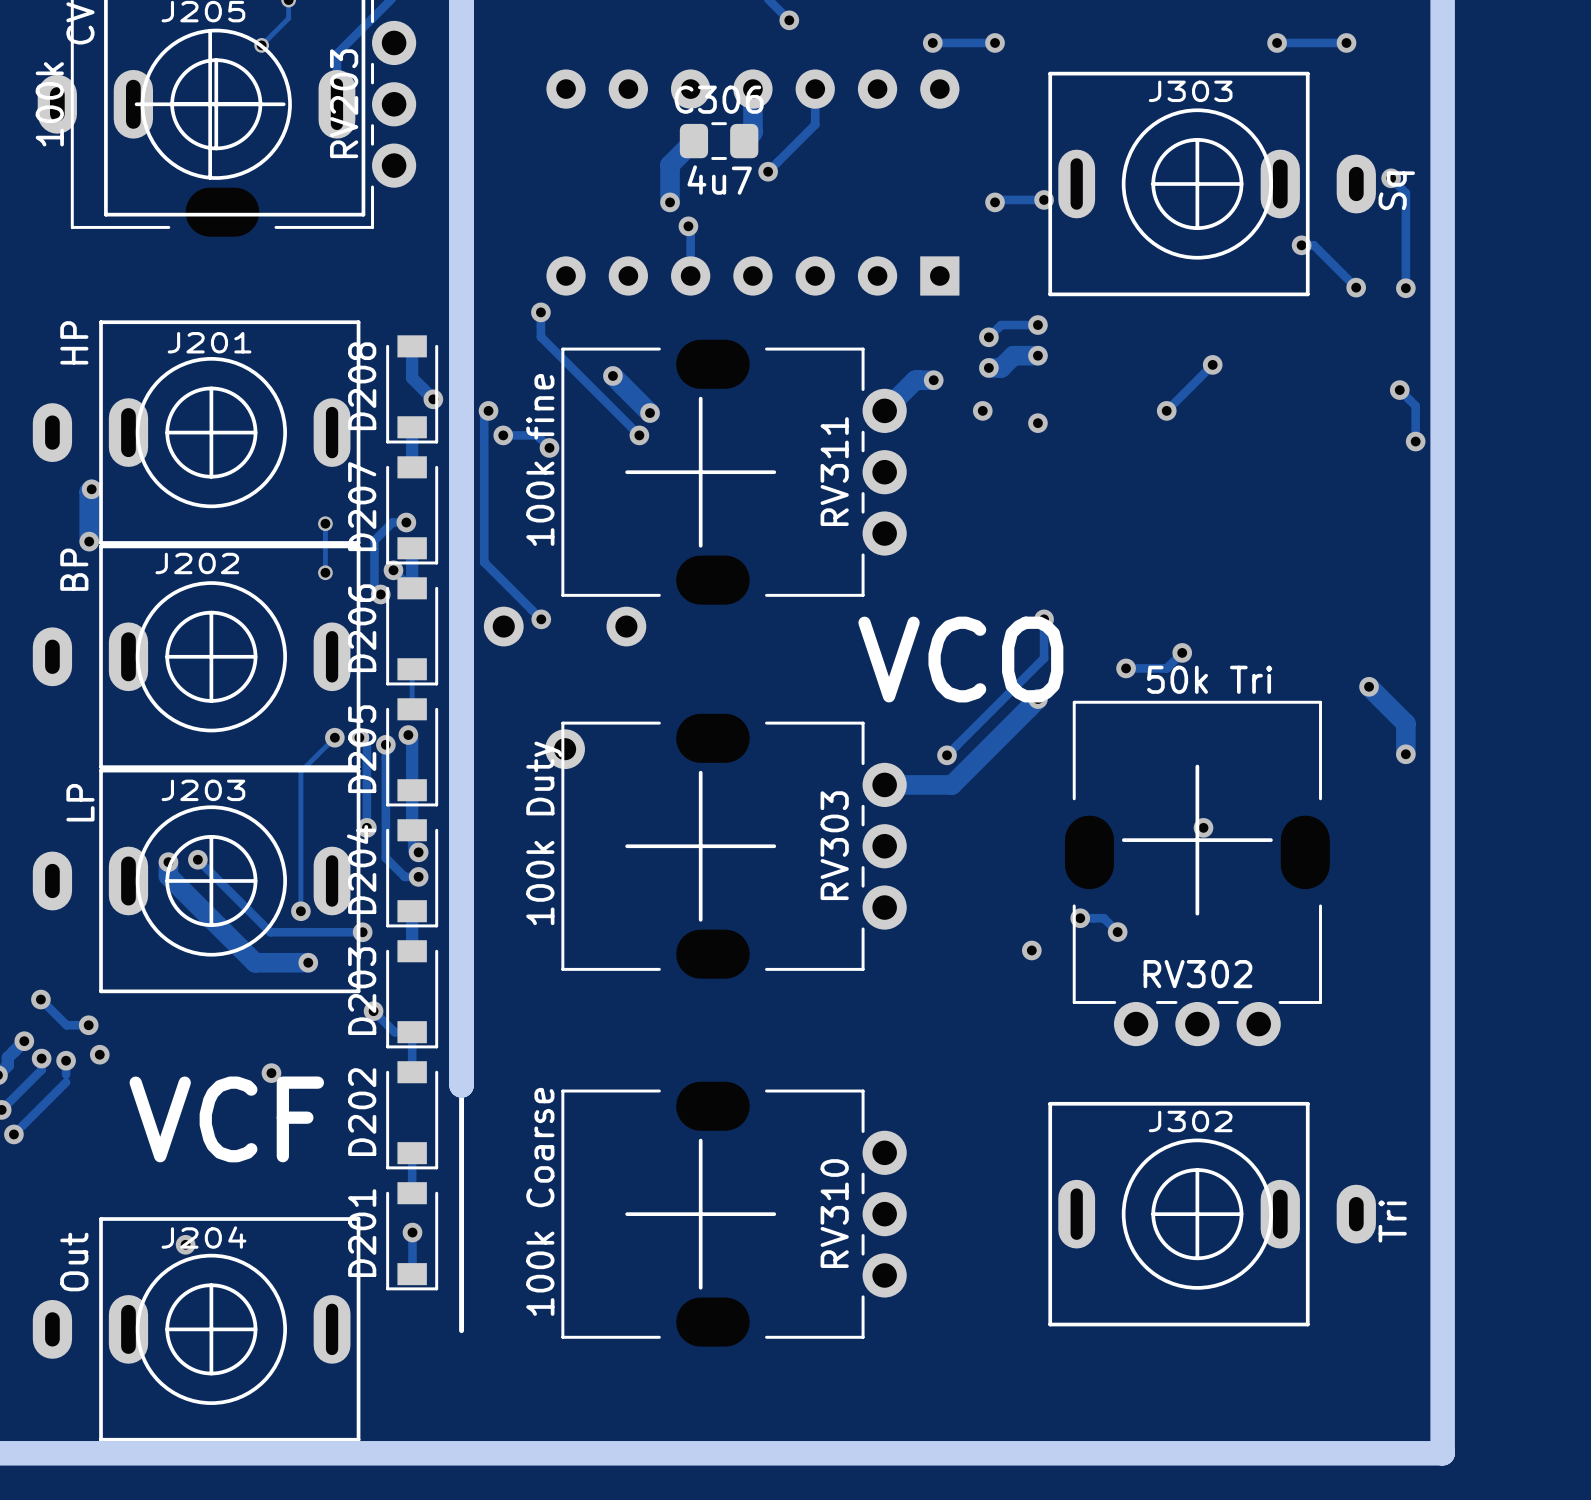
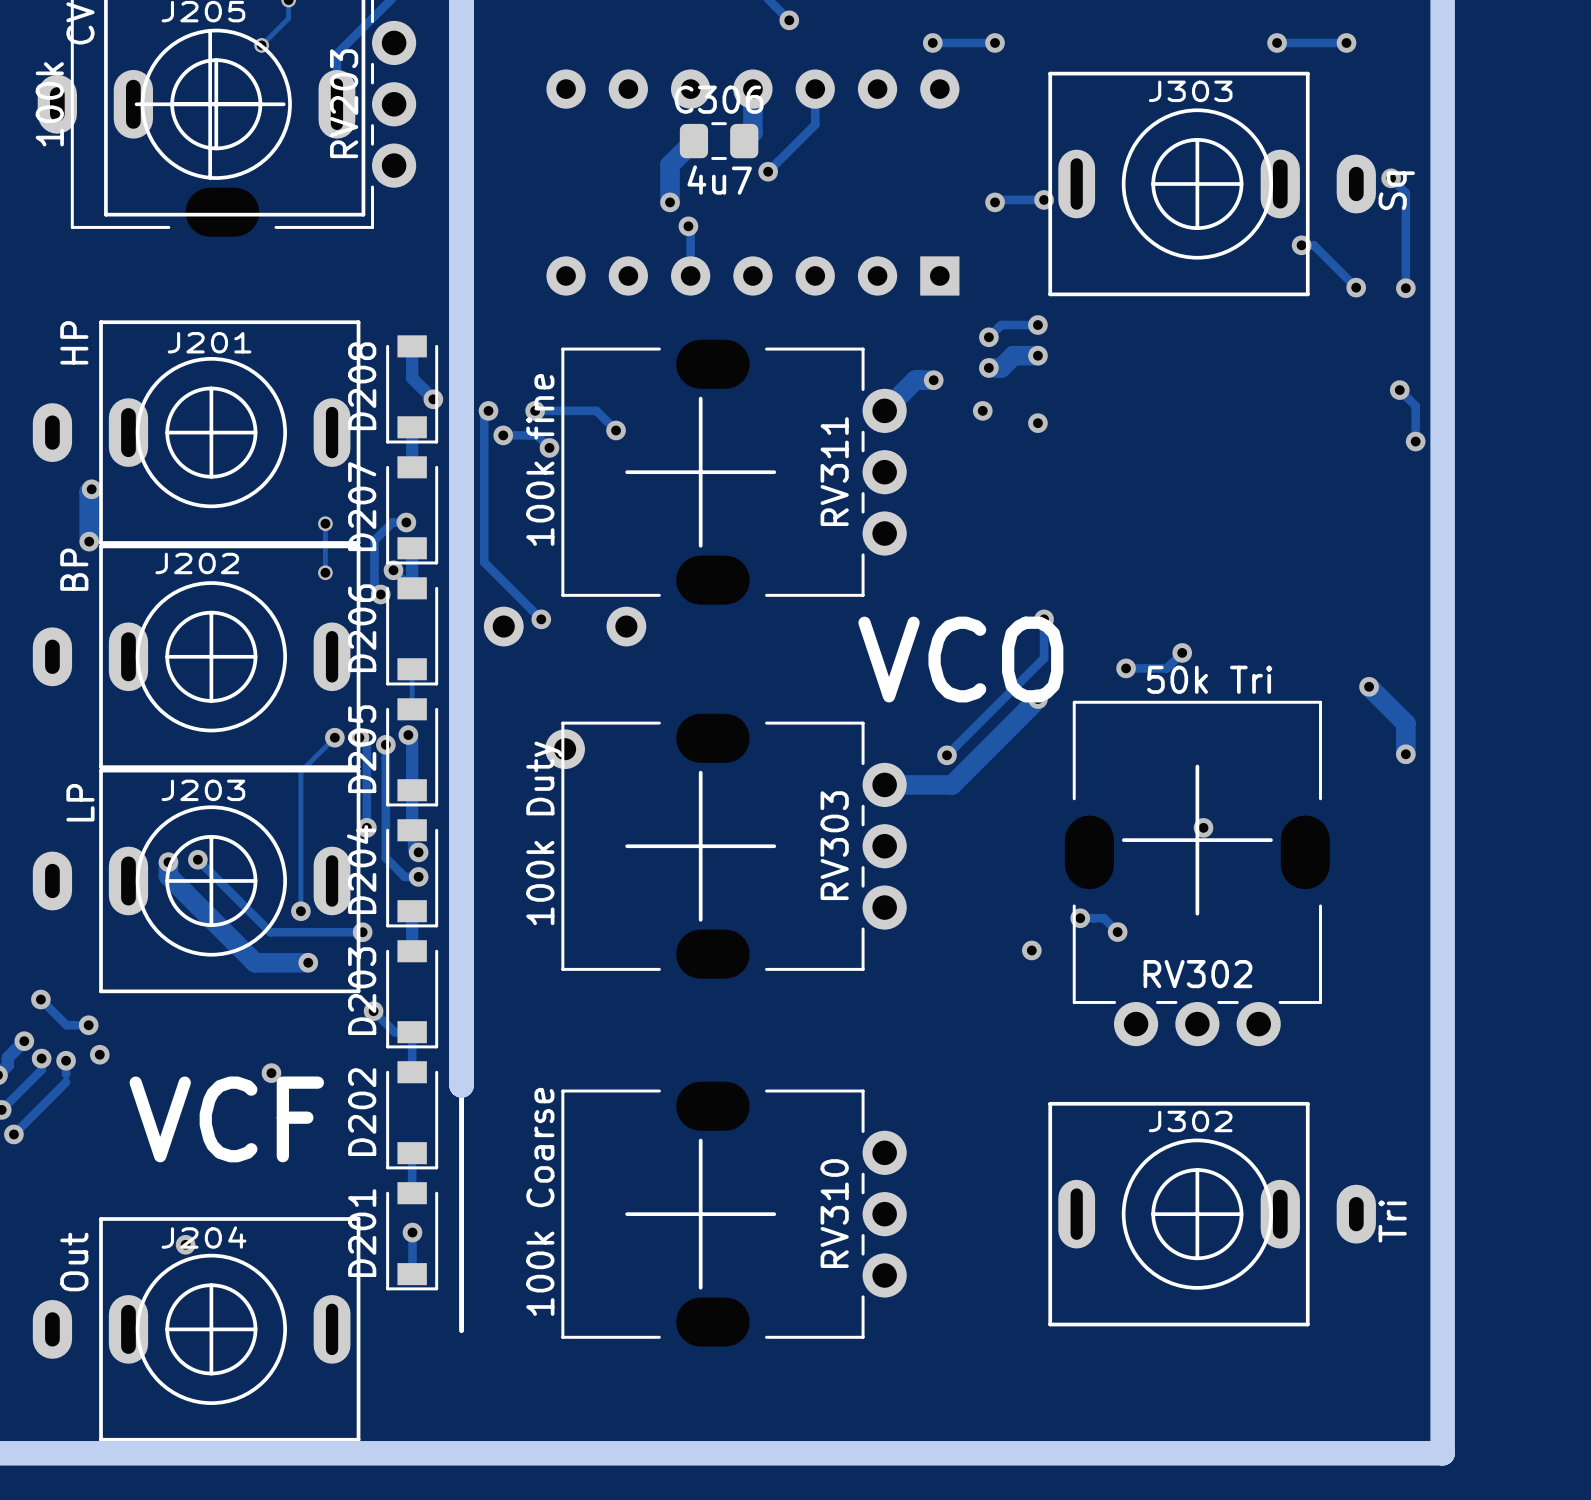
track: (540, 312) (540, 336) (639, 435) -> none
via: (540, 312) -> none
track: (1212, 364) (1166, 410) -> none
via: (1212, 364) -> none
track: (612, 375) (650, 413) -> none
via: (612, 375) -> none
track: none -> (535, 410) (596, 410) (616, 430)
via: none -> (535, 410)
via: (1166, 410) -> none
via: (650, 413) -> none
via: none -> (616, 430)
via: (639, 435) -> none

